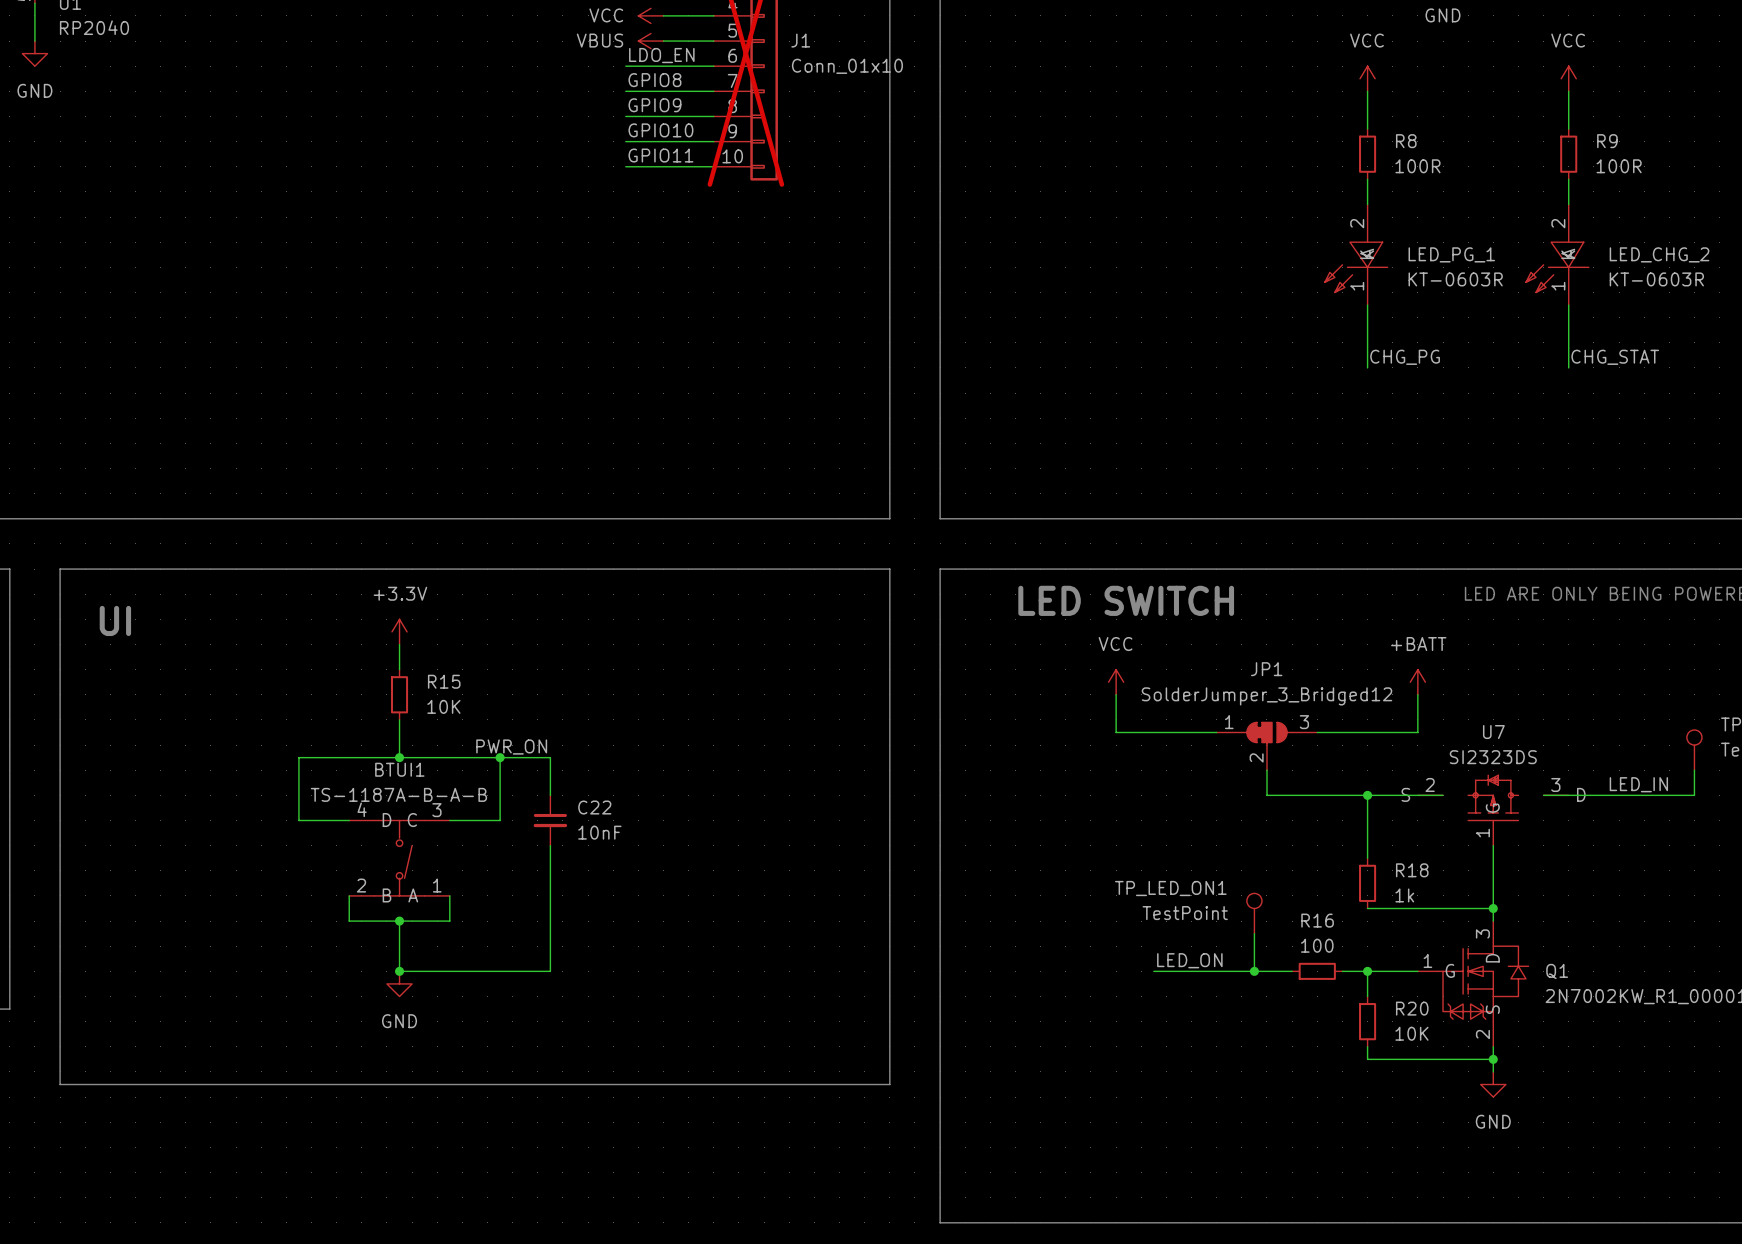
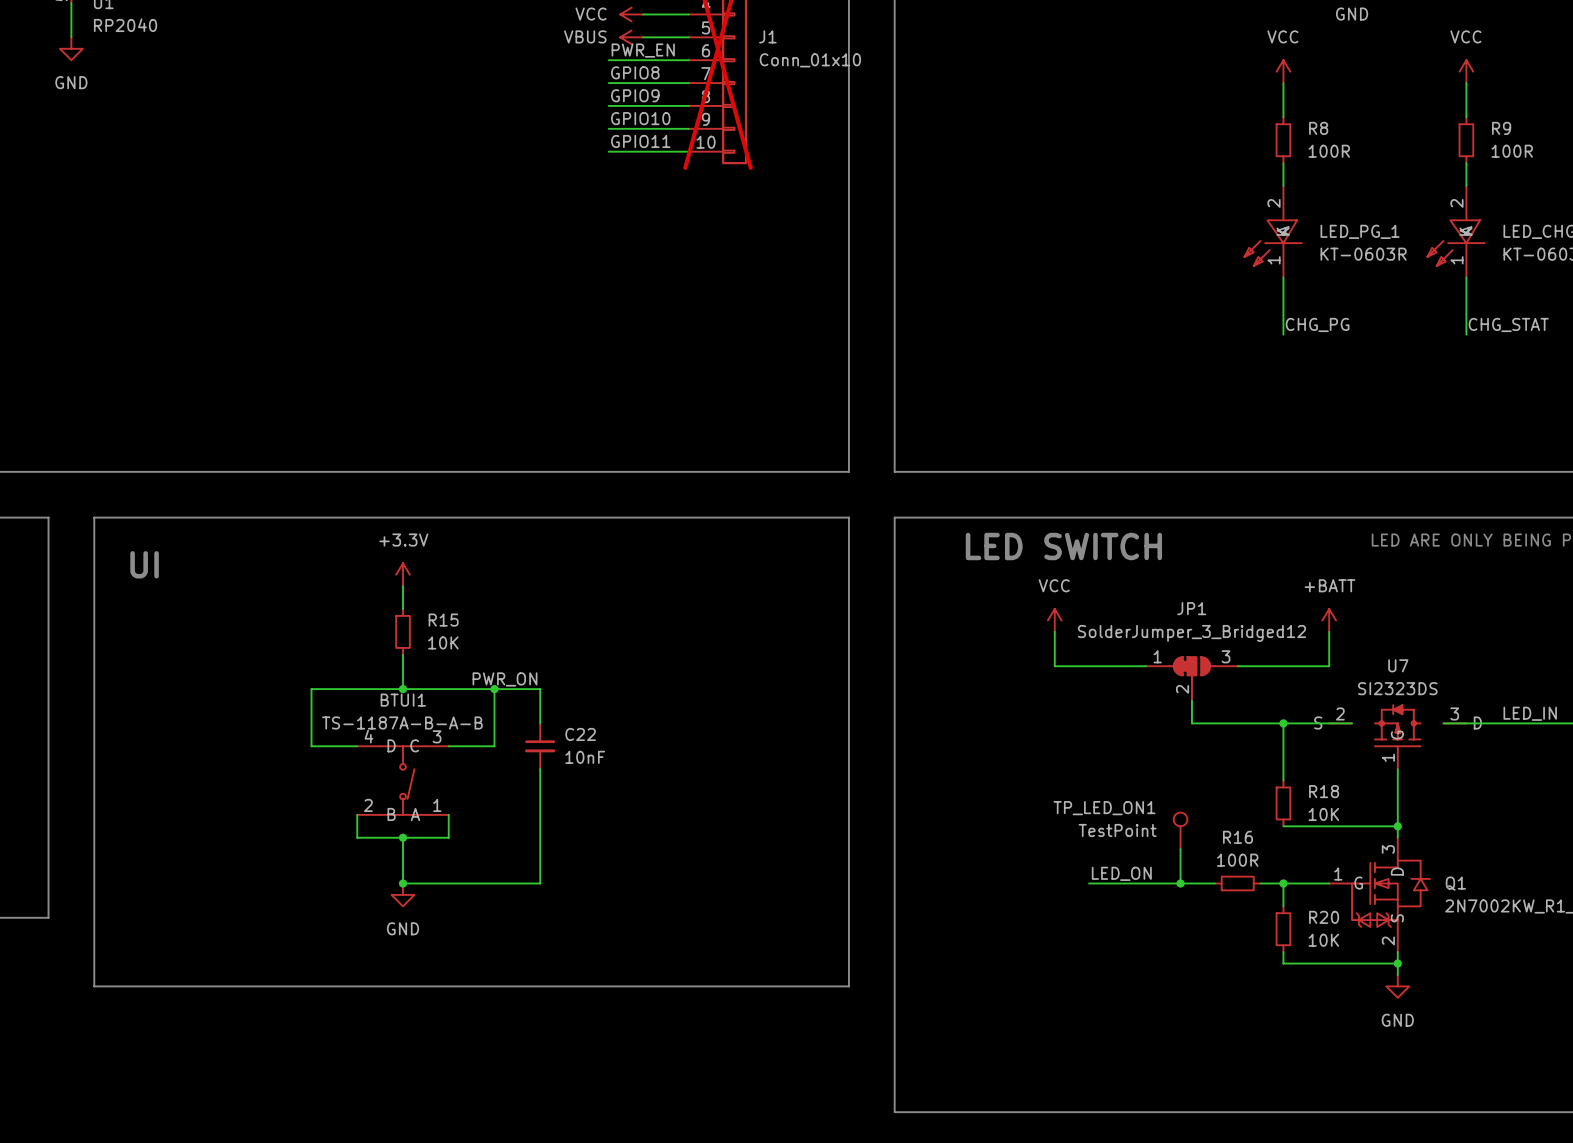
label: LDO_EN (661, 55) -> PWR_EN (643, 50)
R18 value: 1k (1404, 895) -> 10K (1323, 814)
R16 value: 100 (1317, 945) -> 100R (1237, 860)

